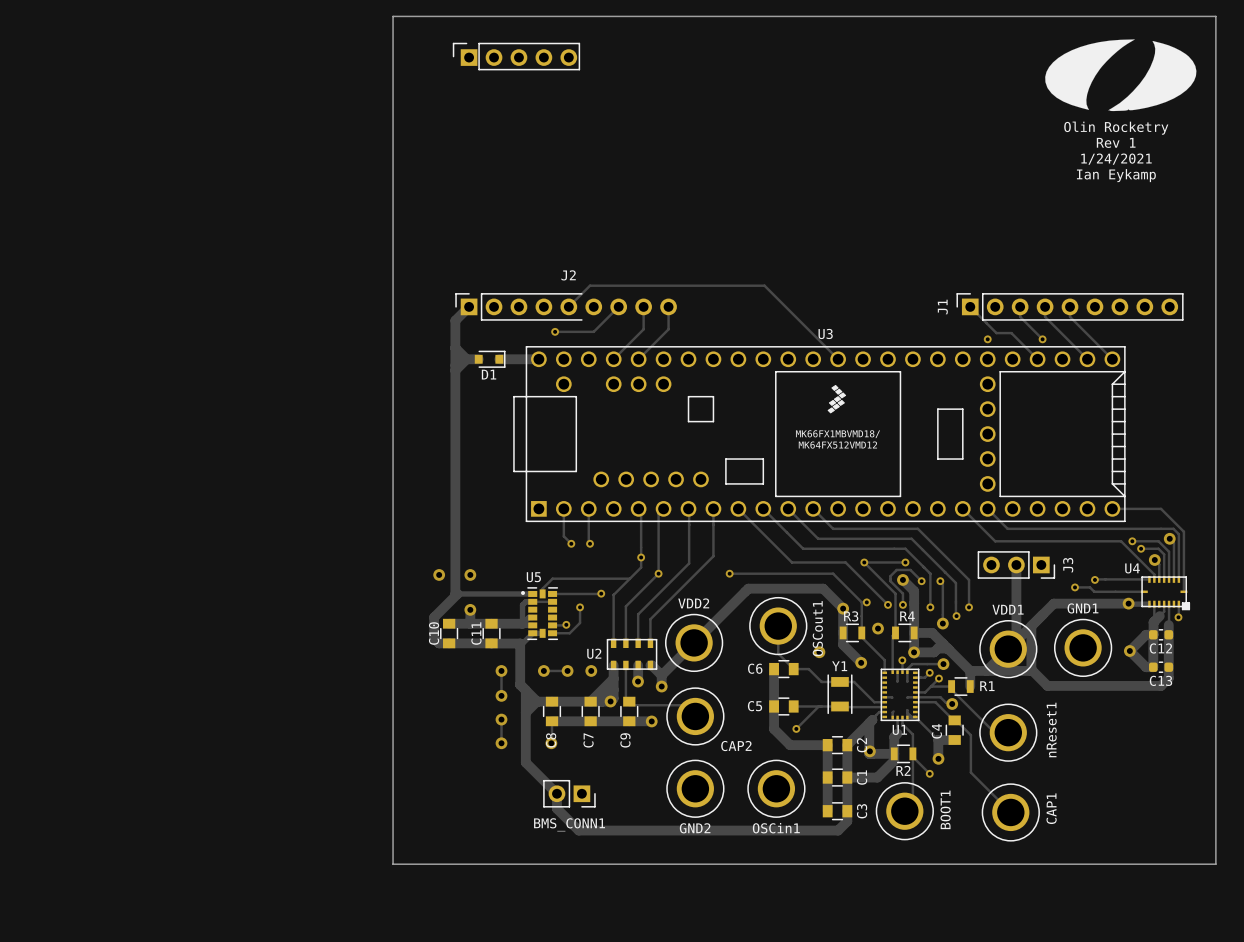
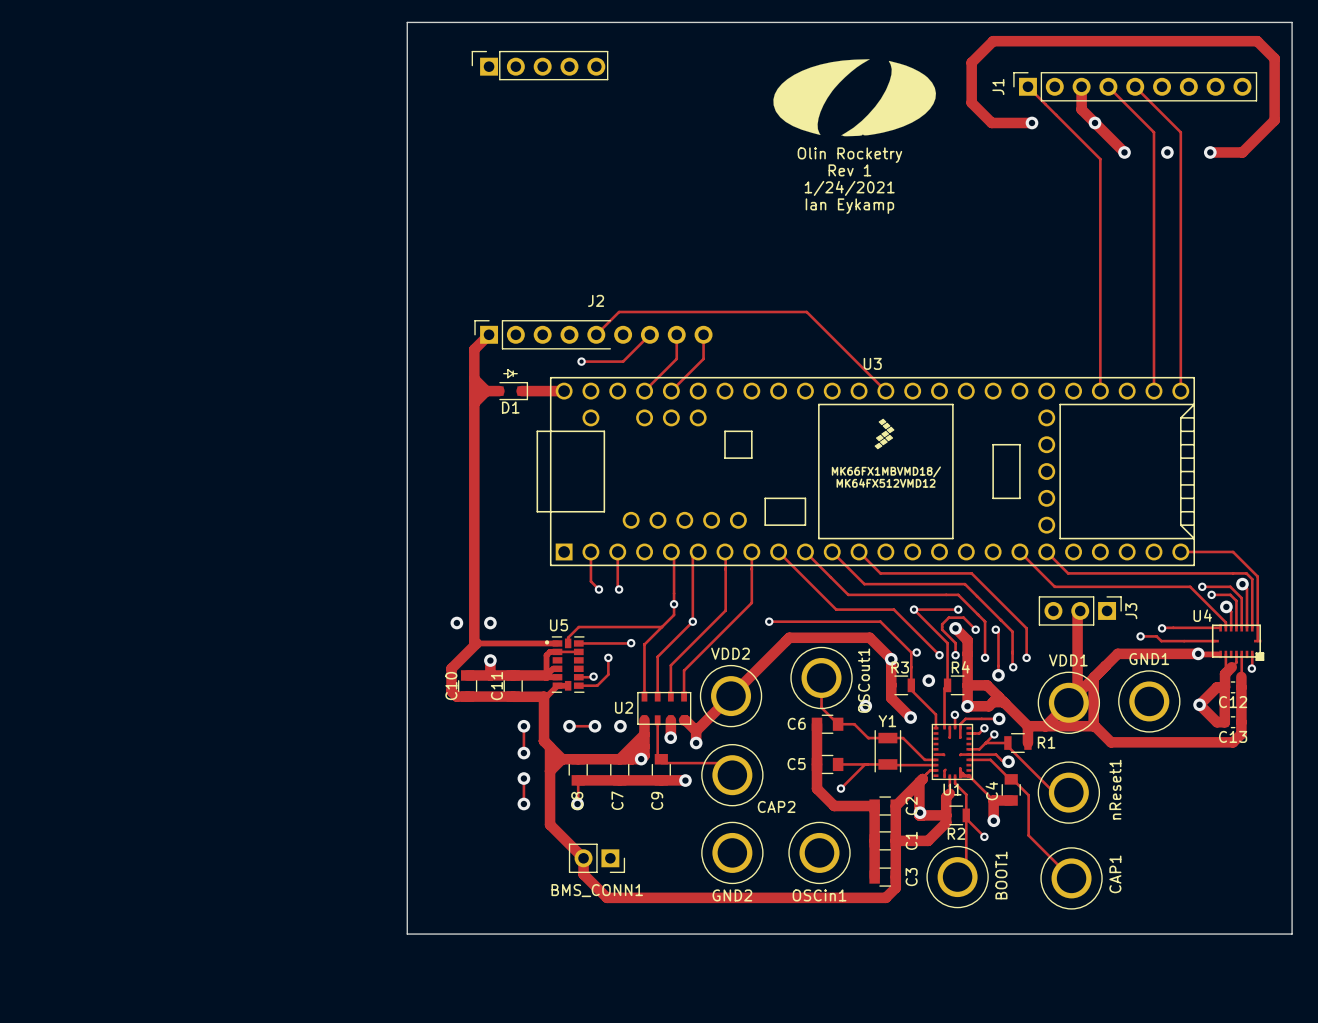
drawing: [1045, 39, 1197, 112] -> none
drawing: none -> [773, 59, 936, 137]
track: none -> (1081, 86) (1081, 109) (1124, 152)
track: none -> (1032, 122) (991, 122) (971, 102) (971, 62) (993, 41) (1257, 41) (1274, 58) (1274, 120) (1242, 152) (1210, 152)
via: none -> (1032, 122)
via: none -> (1095, 122)
text: Olin Rocketry (1116, 128) -> none
via: none -> (1124, 152)
via: none -> (1167, 152)
via: none -> (1210, 152)
text: none -> Olin Rocketry (849, 155)
text: Rev 1 (1116, 142) -> none
text: none -> Rev 1 (849, 170)
text: 1/24/2021 (1116, 159) -> none
text: none -> 1/24/2021 (849, 188)
text: Ian Eykamp (1116, 175) -> none
text: none -> Ian Eykamp (849, 206)
track: (970, 306) (996, 333) (1011, 333) (1037, 359) -> (1027, 86) (1100, 159) (1100, 391)
track: (1020, 306) (1020, 316) (1042, 339) -> none
track: (1045, 306) (1045, 316) (1087, 359) -> (1108, 86) (1153, 132) (1153, 391)
track: (1070, 306) (1070, 316) (1112, 359) -> (1135, 86) (1180, 132) (1180, 391)
J1 position: (1070, 306) -> (1135, 86)
via: (987, 339) -> none
via: (1042, 339) -> none
line: none -> (513, 370) (513, 376)
line: none -> (503, 373) (507, 373)
line: none -> (513, 373) (517, 373)
line: none -> (513, 373) (507, 369) (507, 377) (513, 373)
J3 footprint: [977, 551, 1055, 579] -> [1038, 596, 1122, 626]

